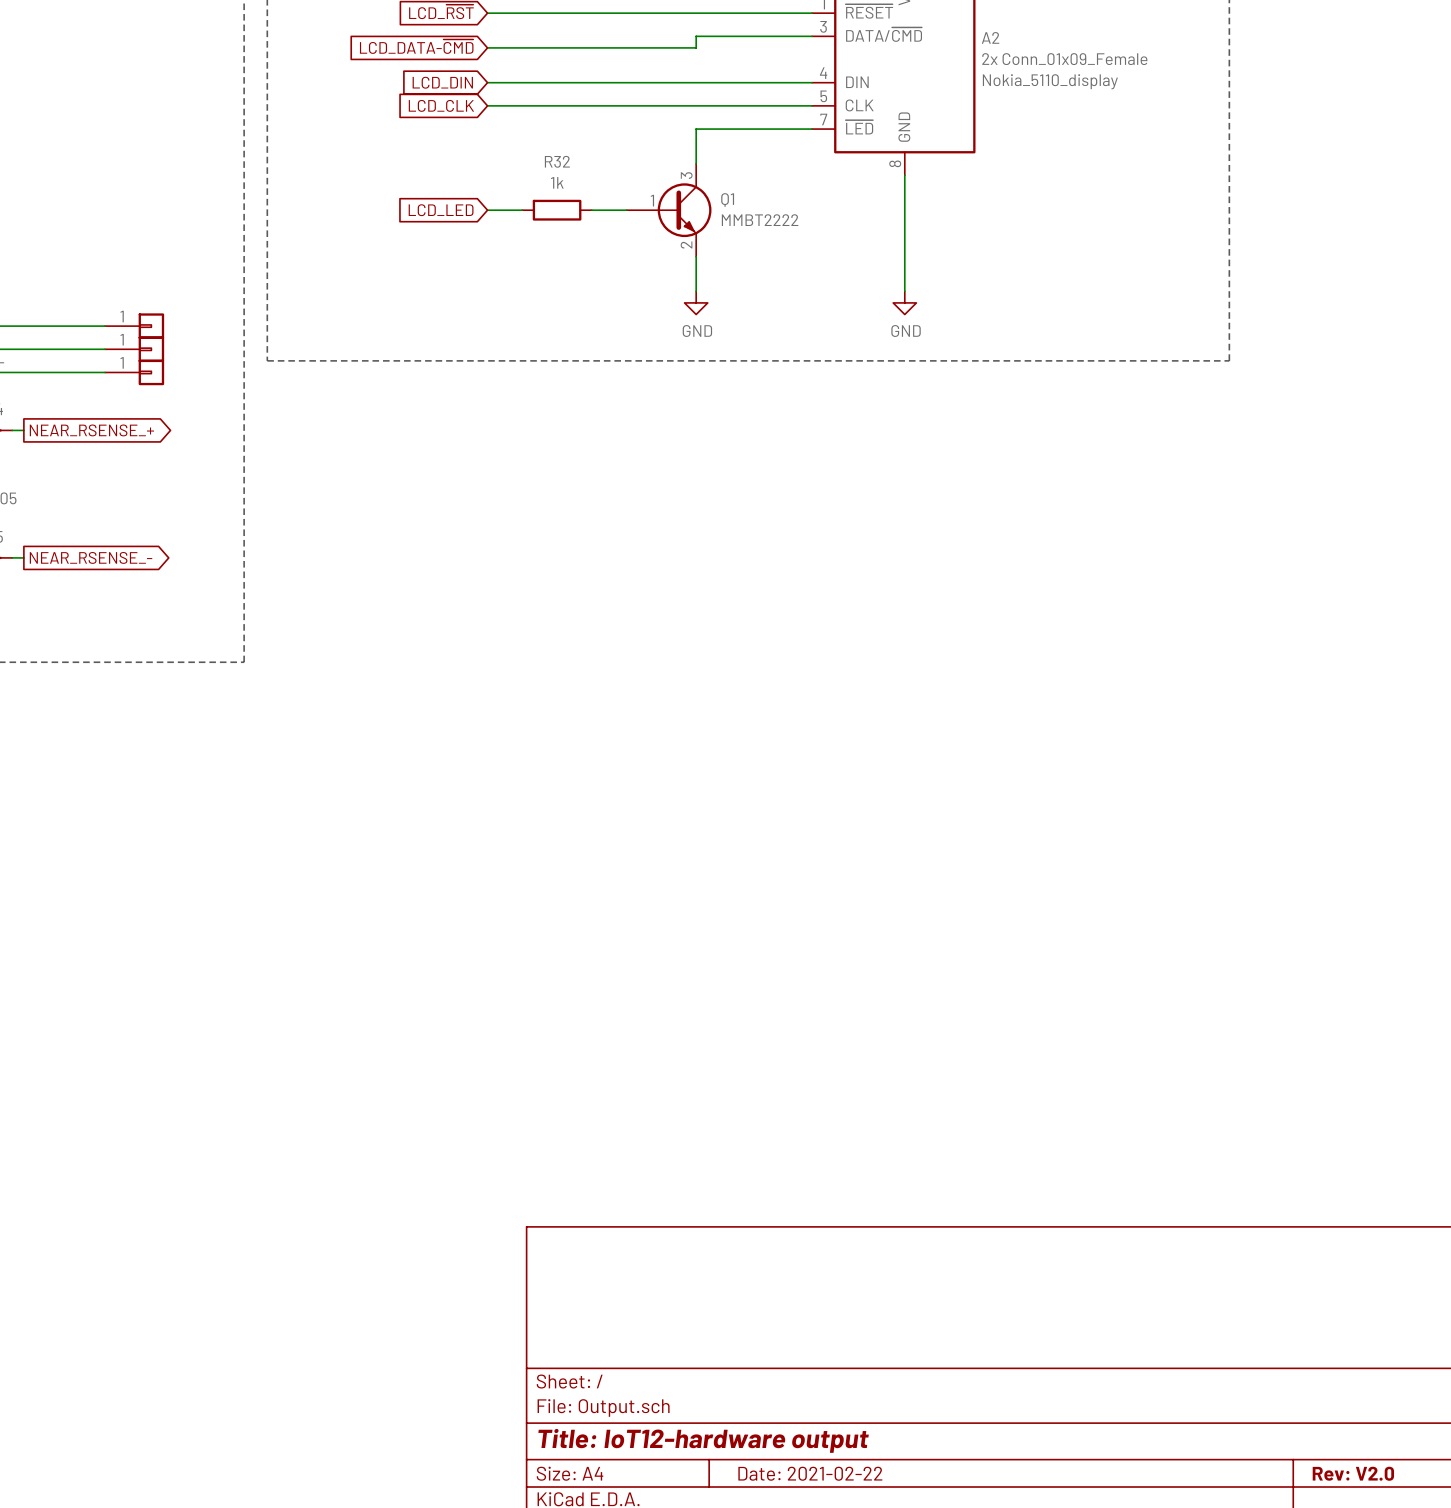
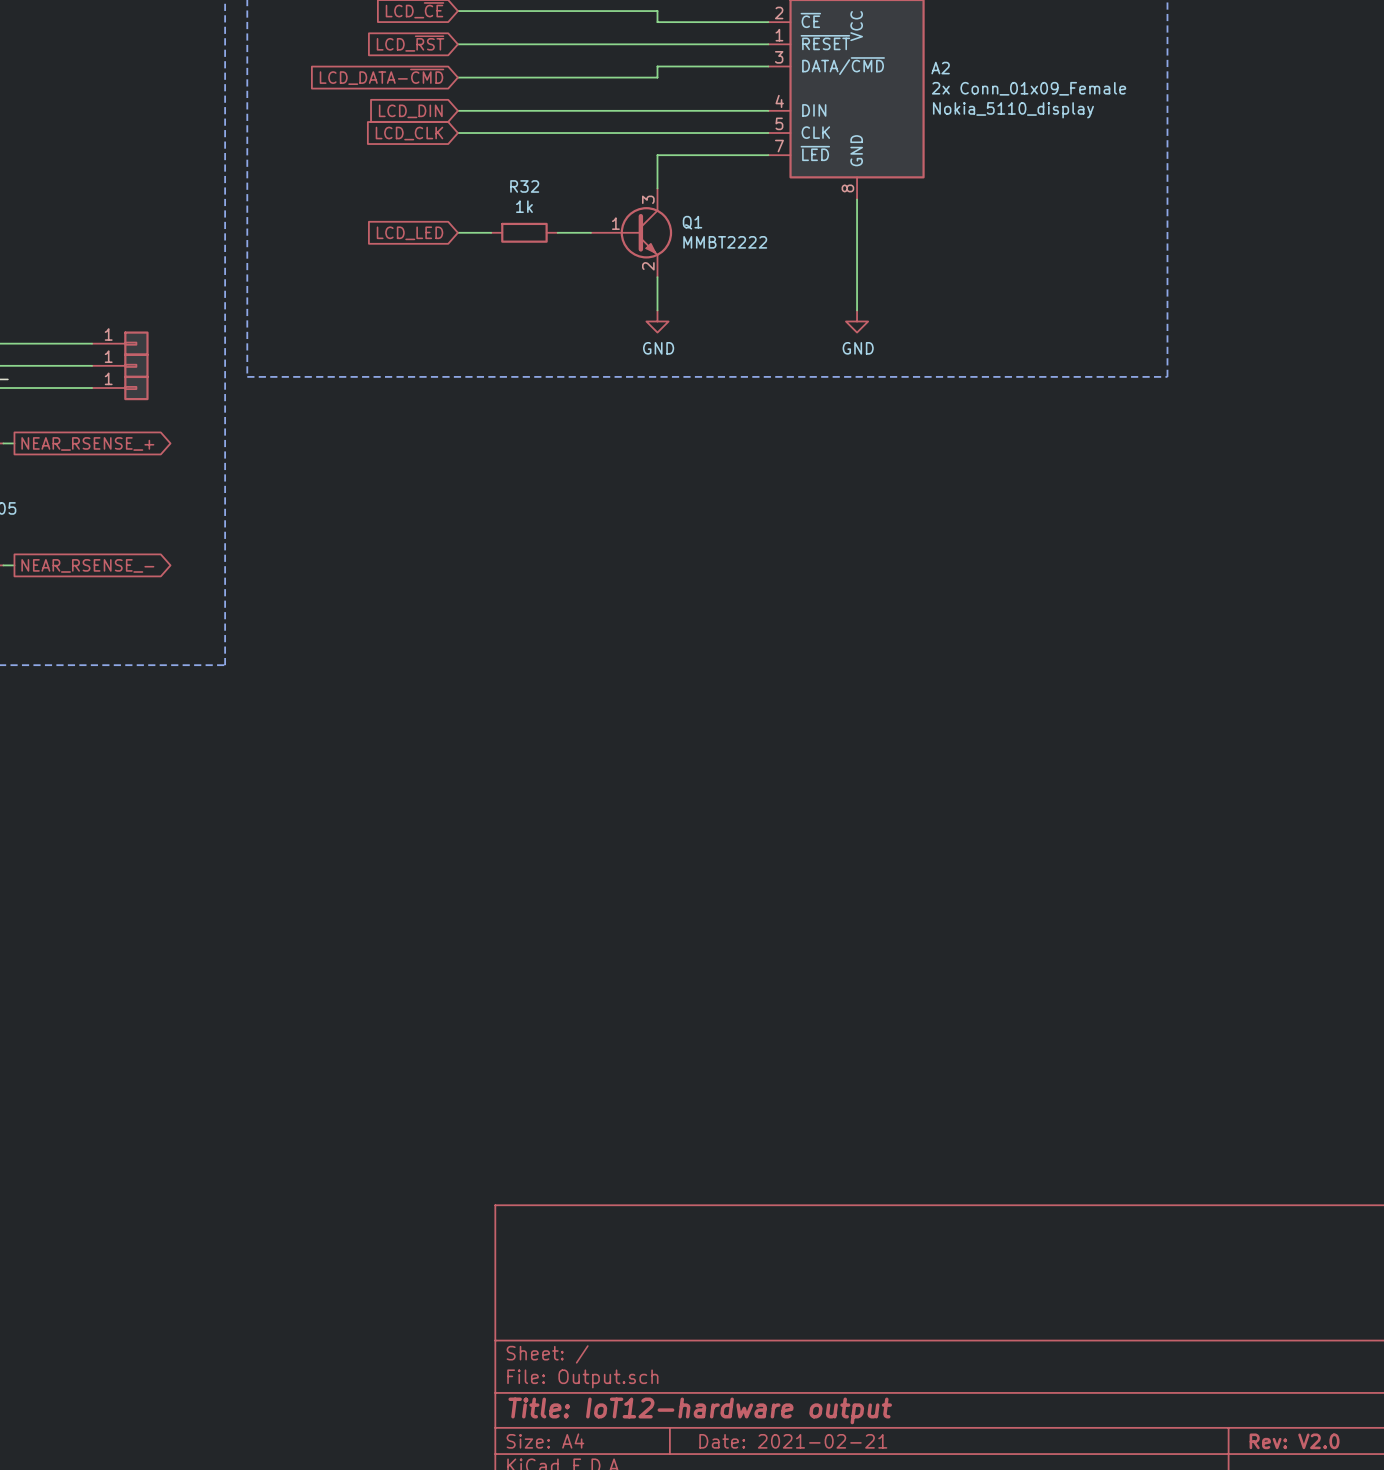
title block: Date: 2021-02-22 (810, 1473) -> Date: 2021-02-21 (793, 1441)

